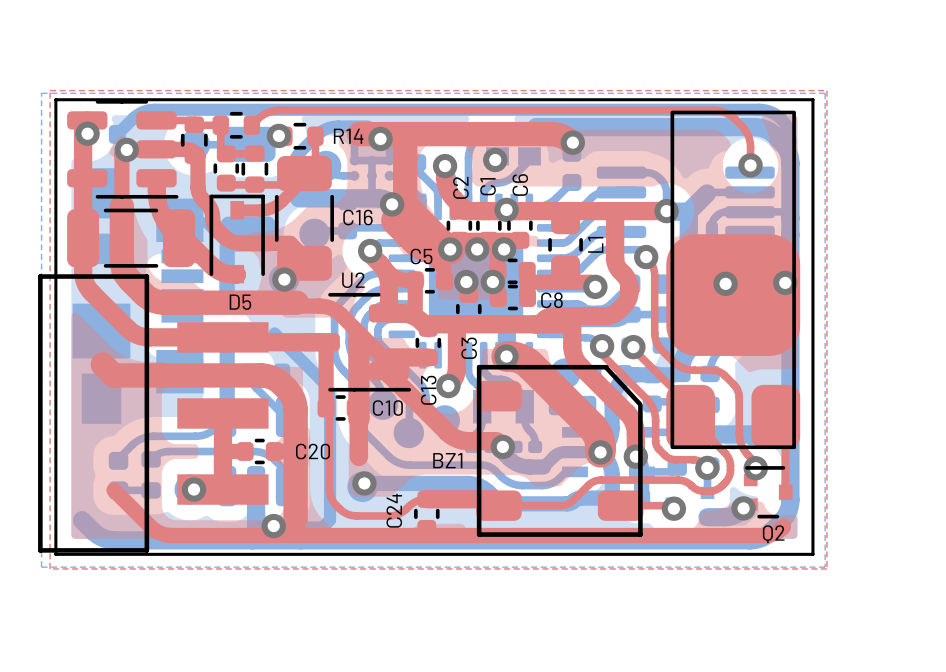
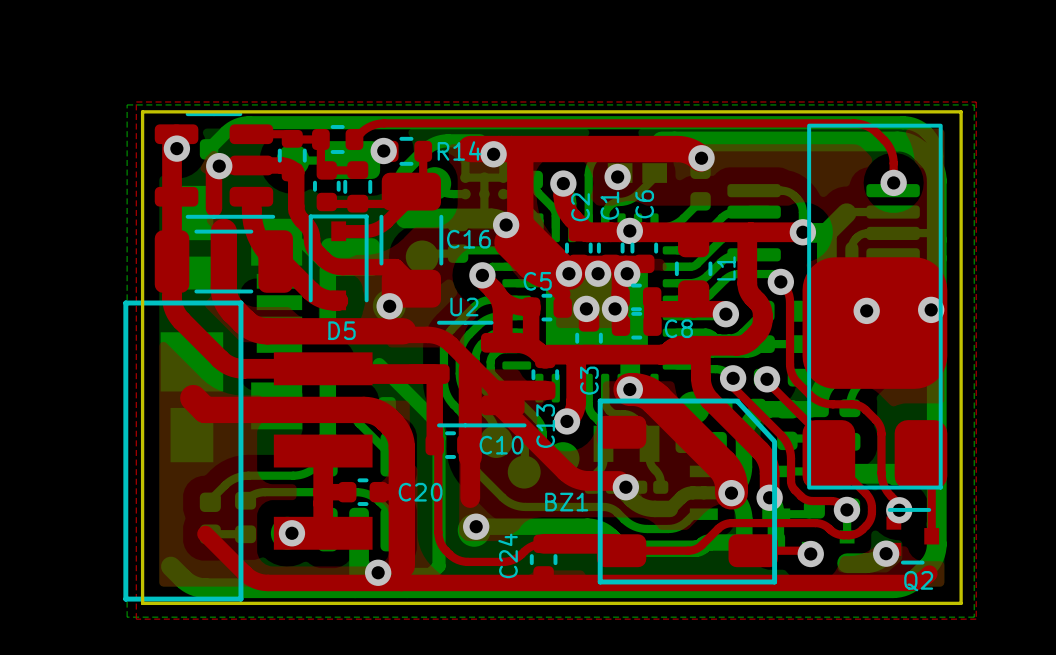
top track: (121, 189) (121, 259) (124, 271) (130, 281) (148, 297) (158, 302) (171, 302) -> (223, 231) (223, 287) (226, 300) (231, 308) (246, 323) (254, 328) (267, 331)

